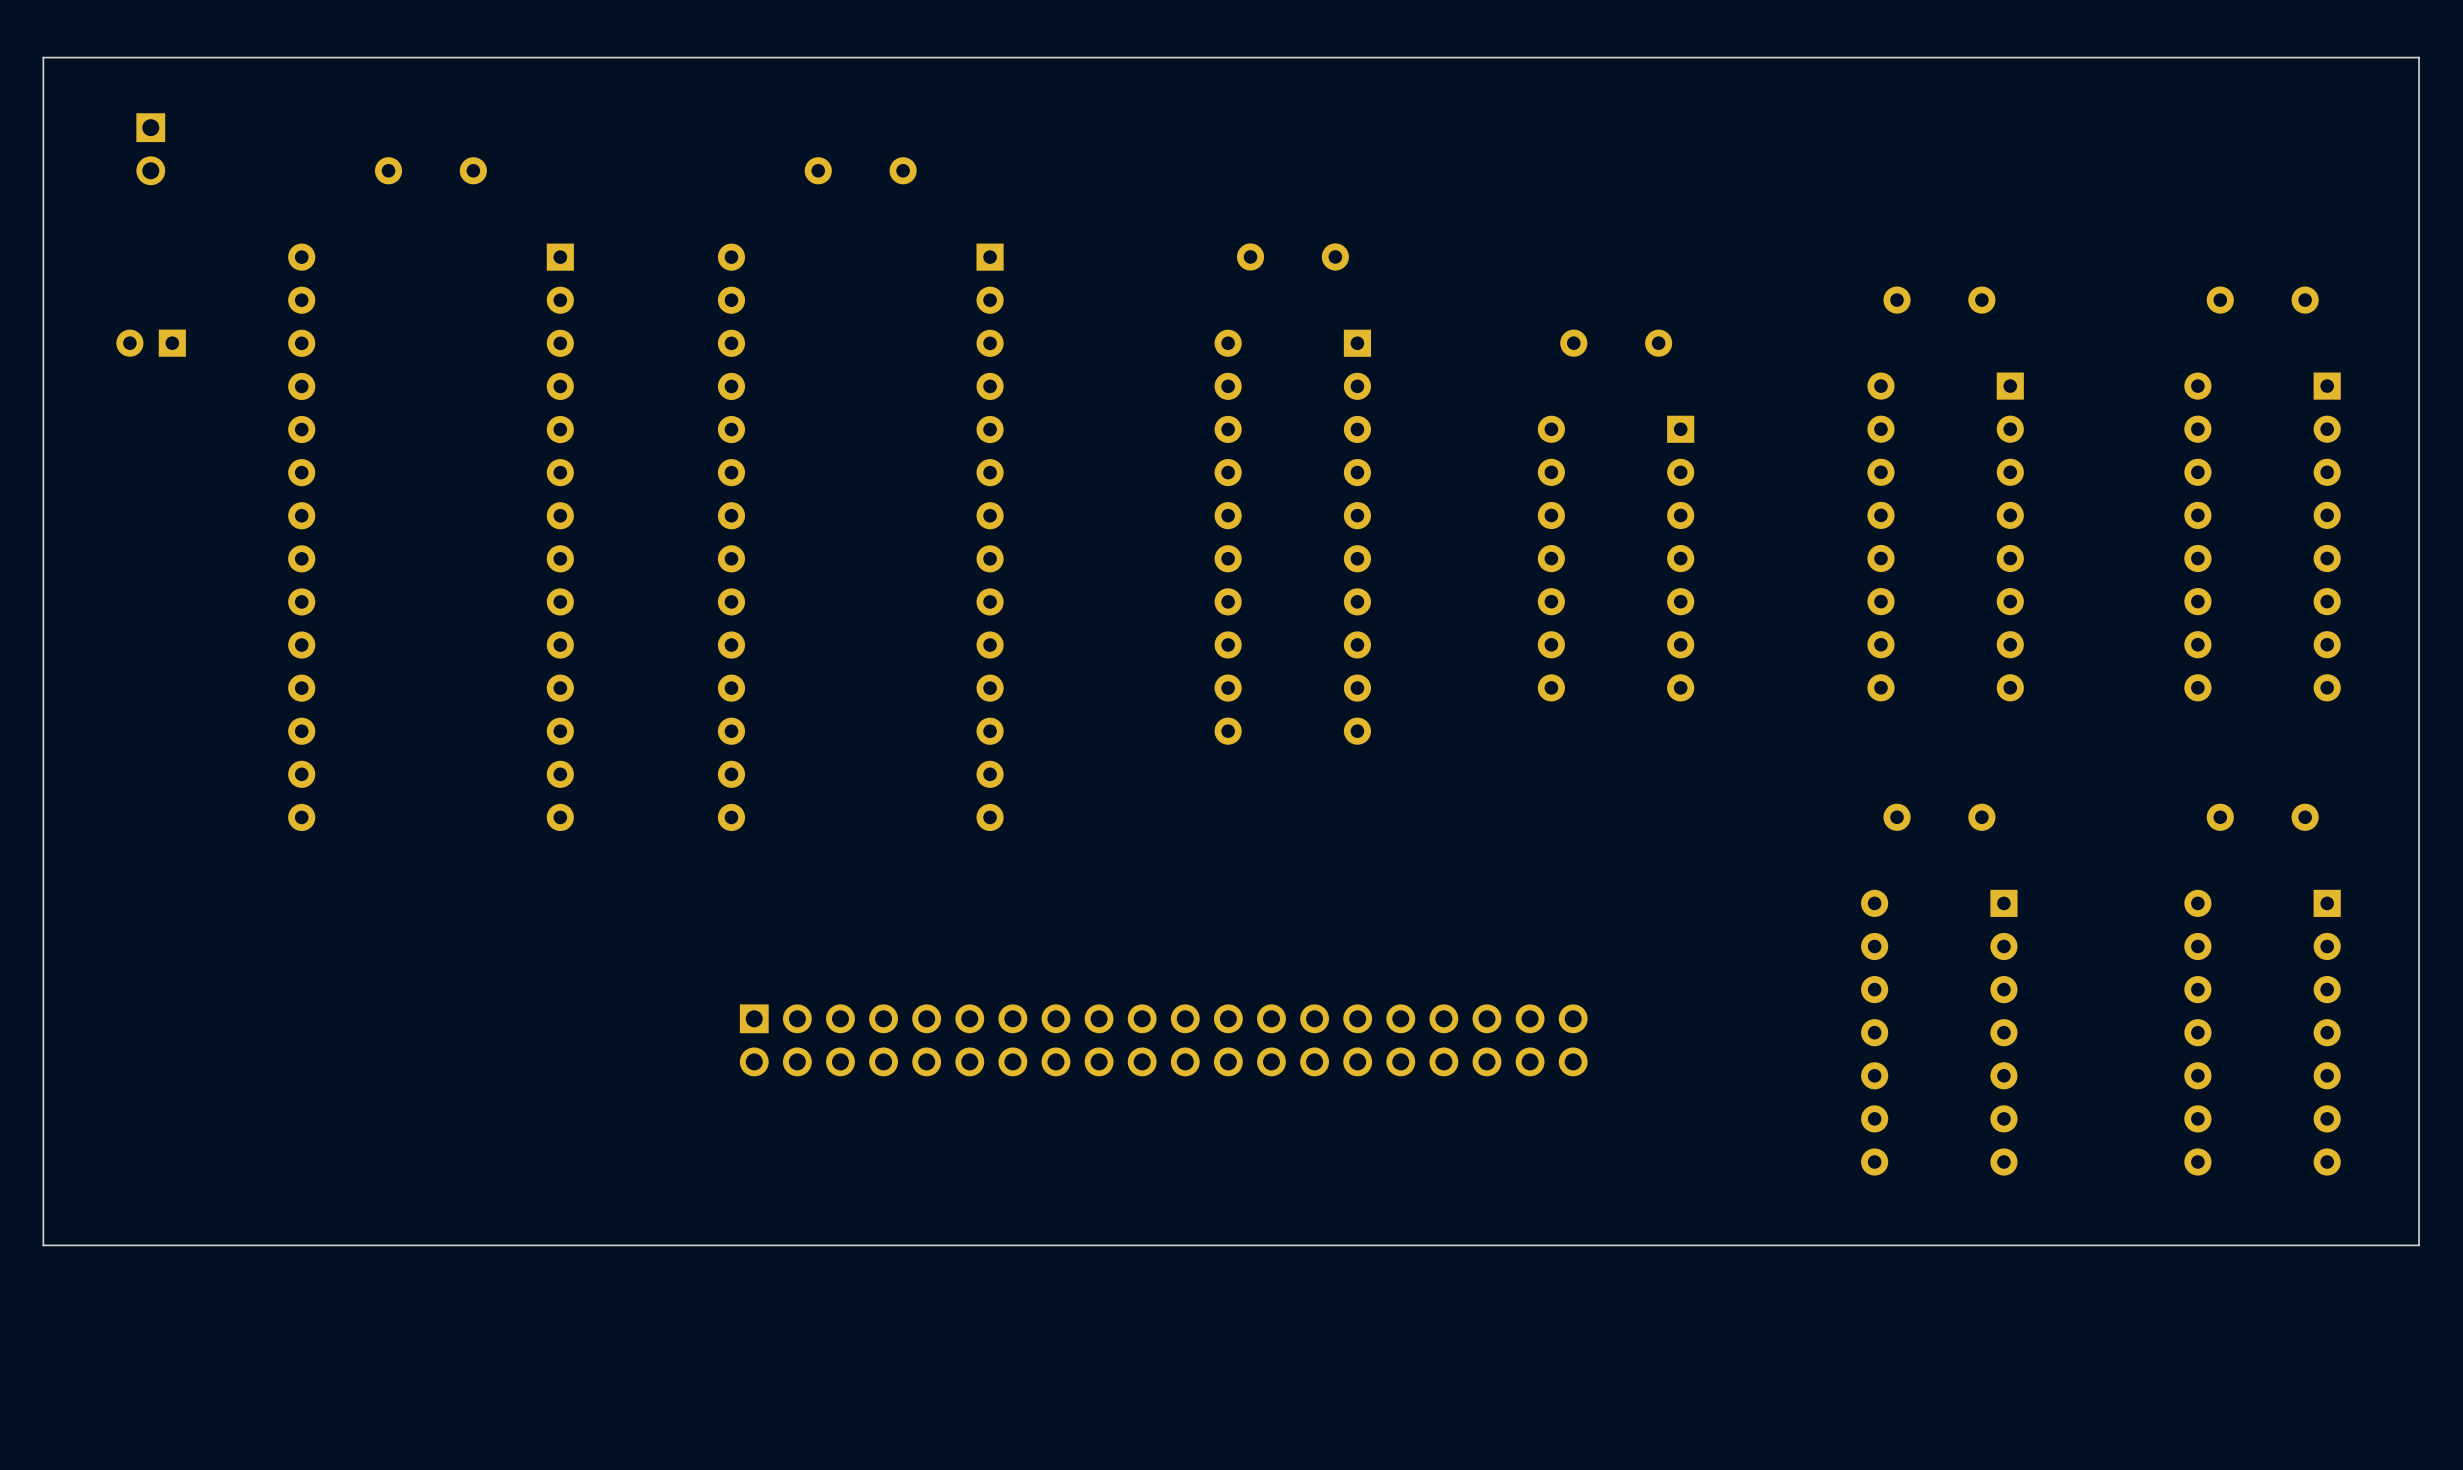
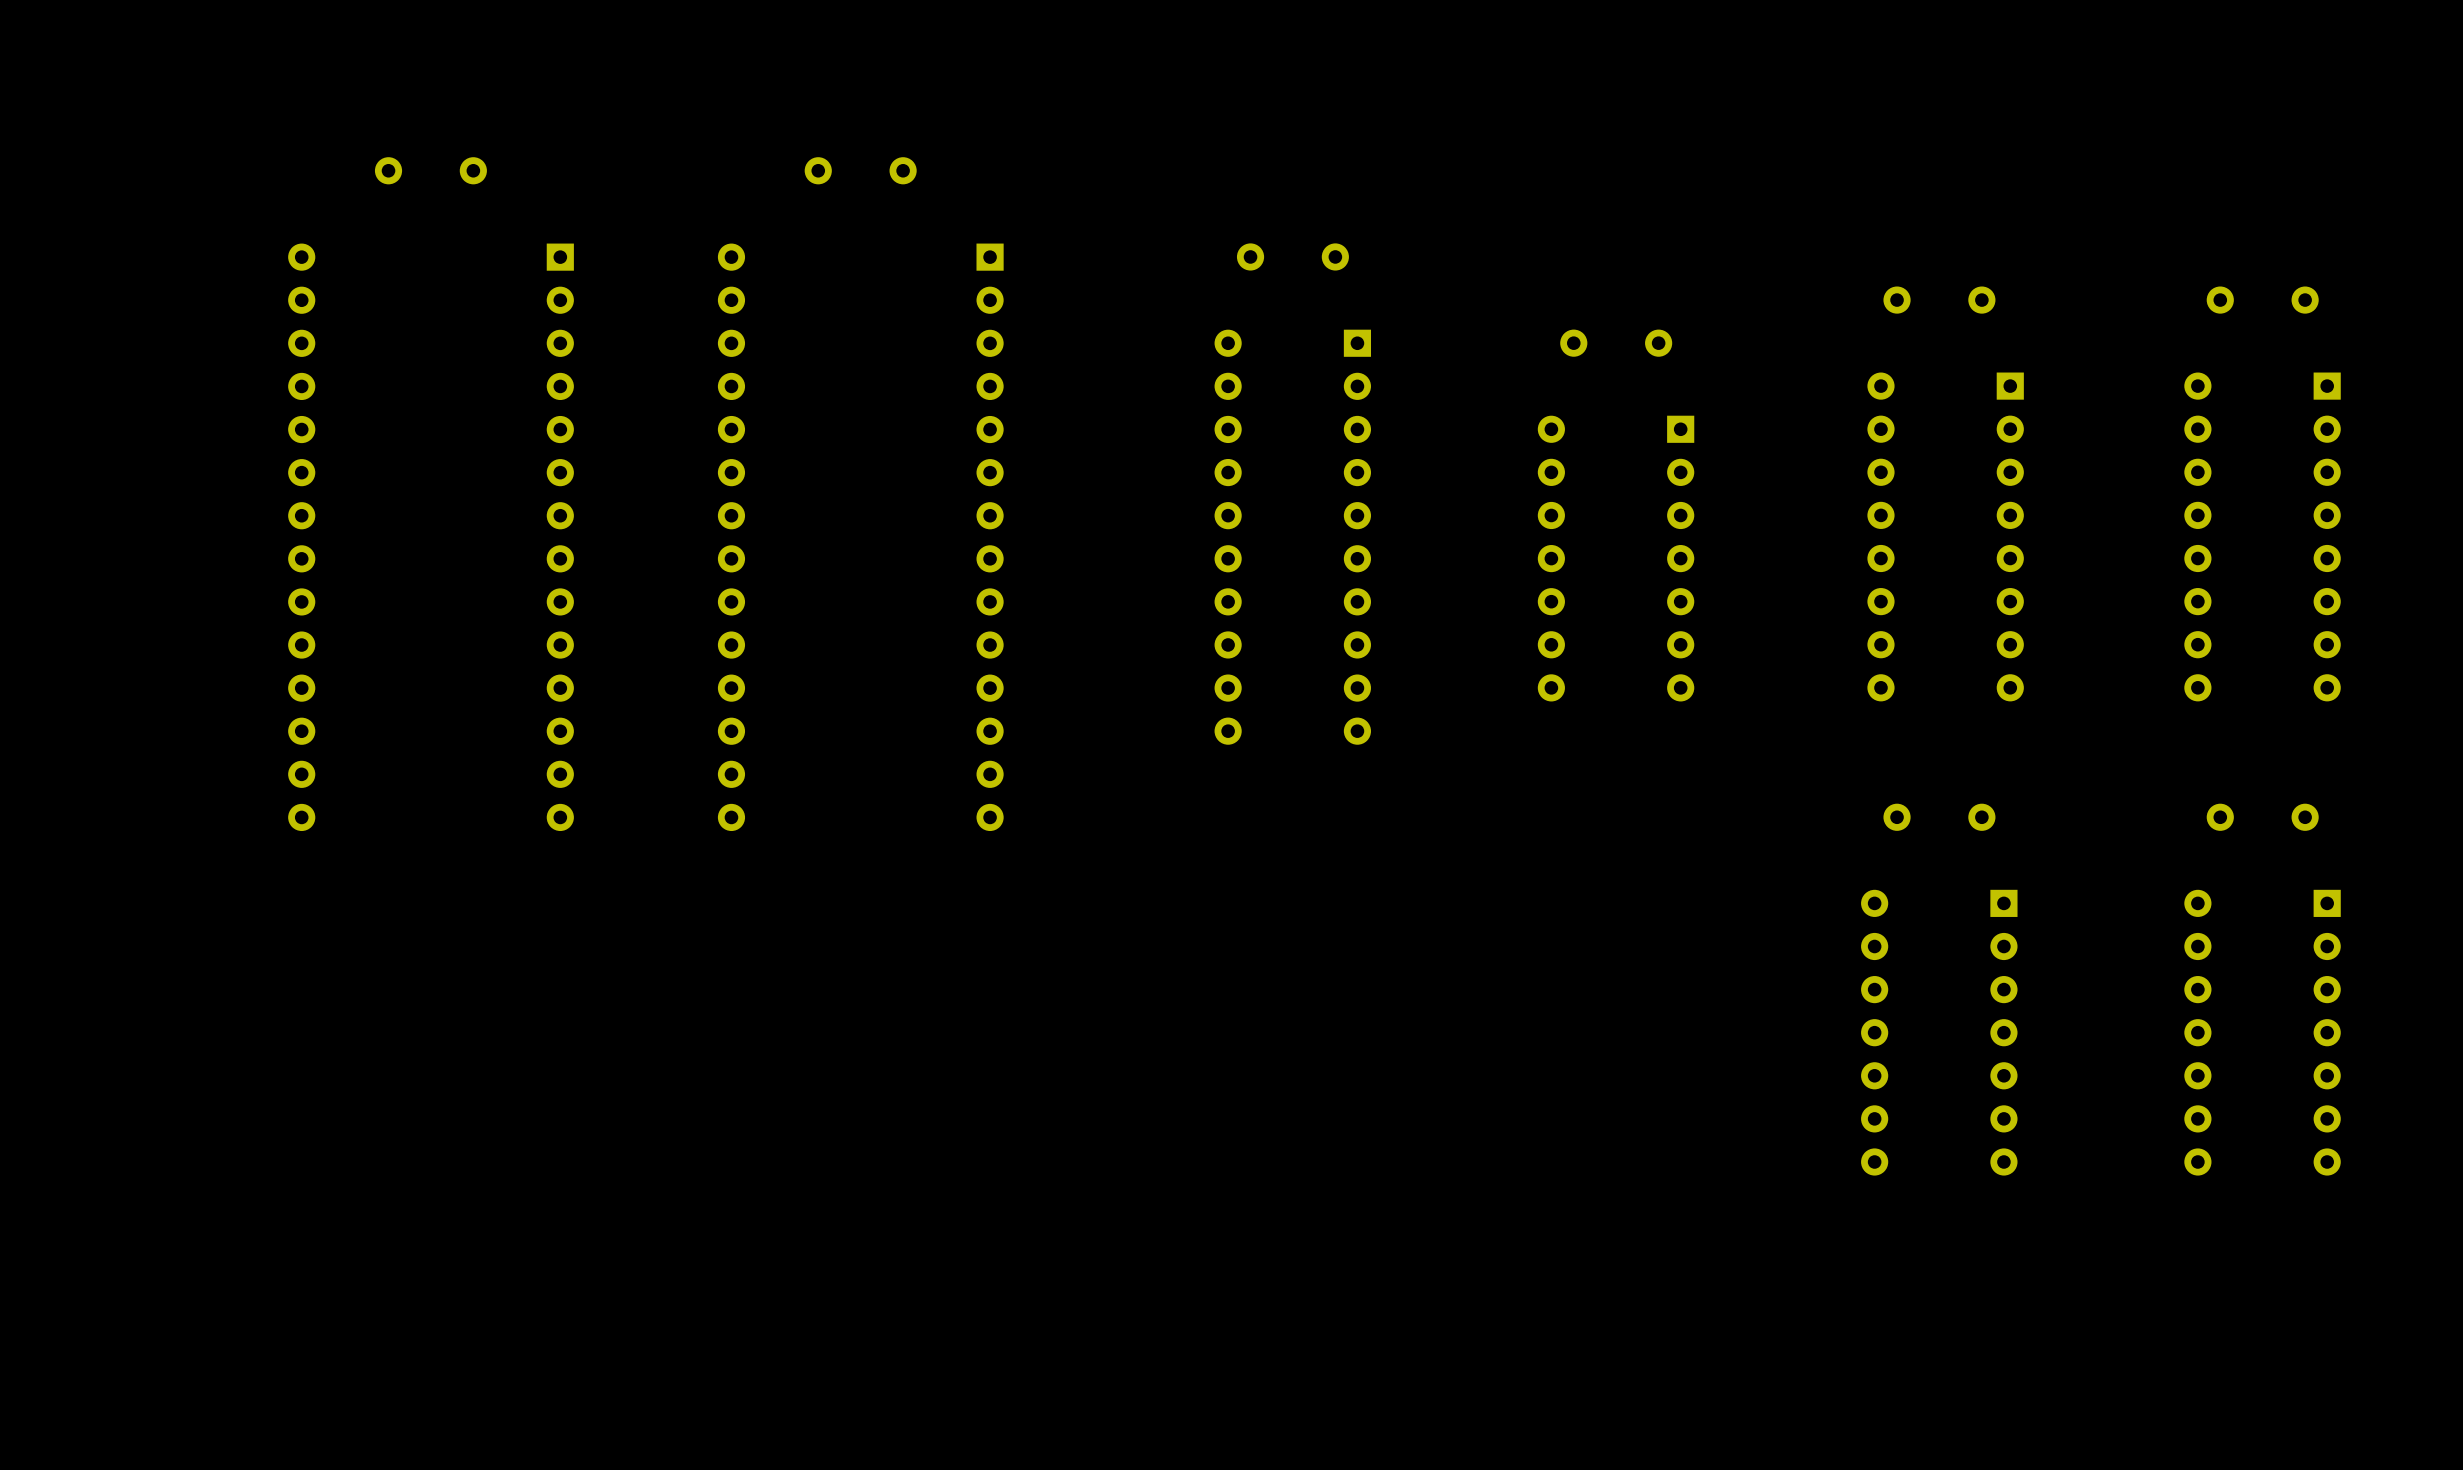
board edge: (2418, 57) (43, 57) (43, 1245) (2418, 1245) (2418, 57) -> none
part: (150, 149) -> none
part: (151, 343) -> none
part: (1163, 1040) -> none

